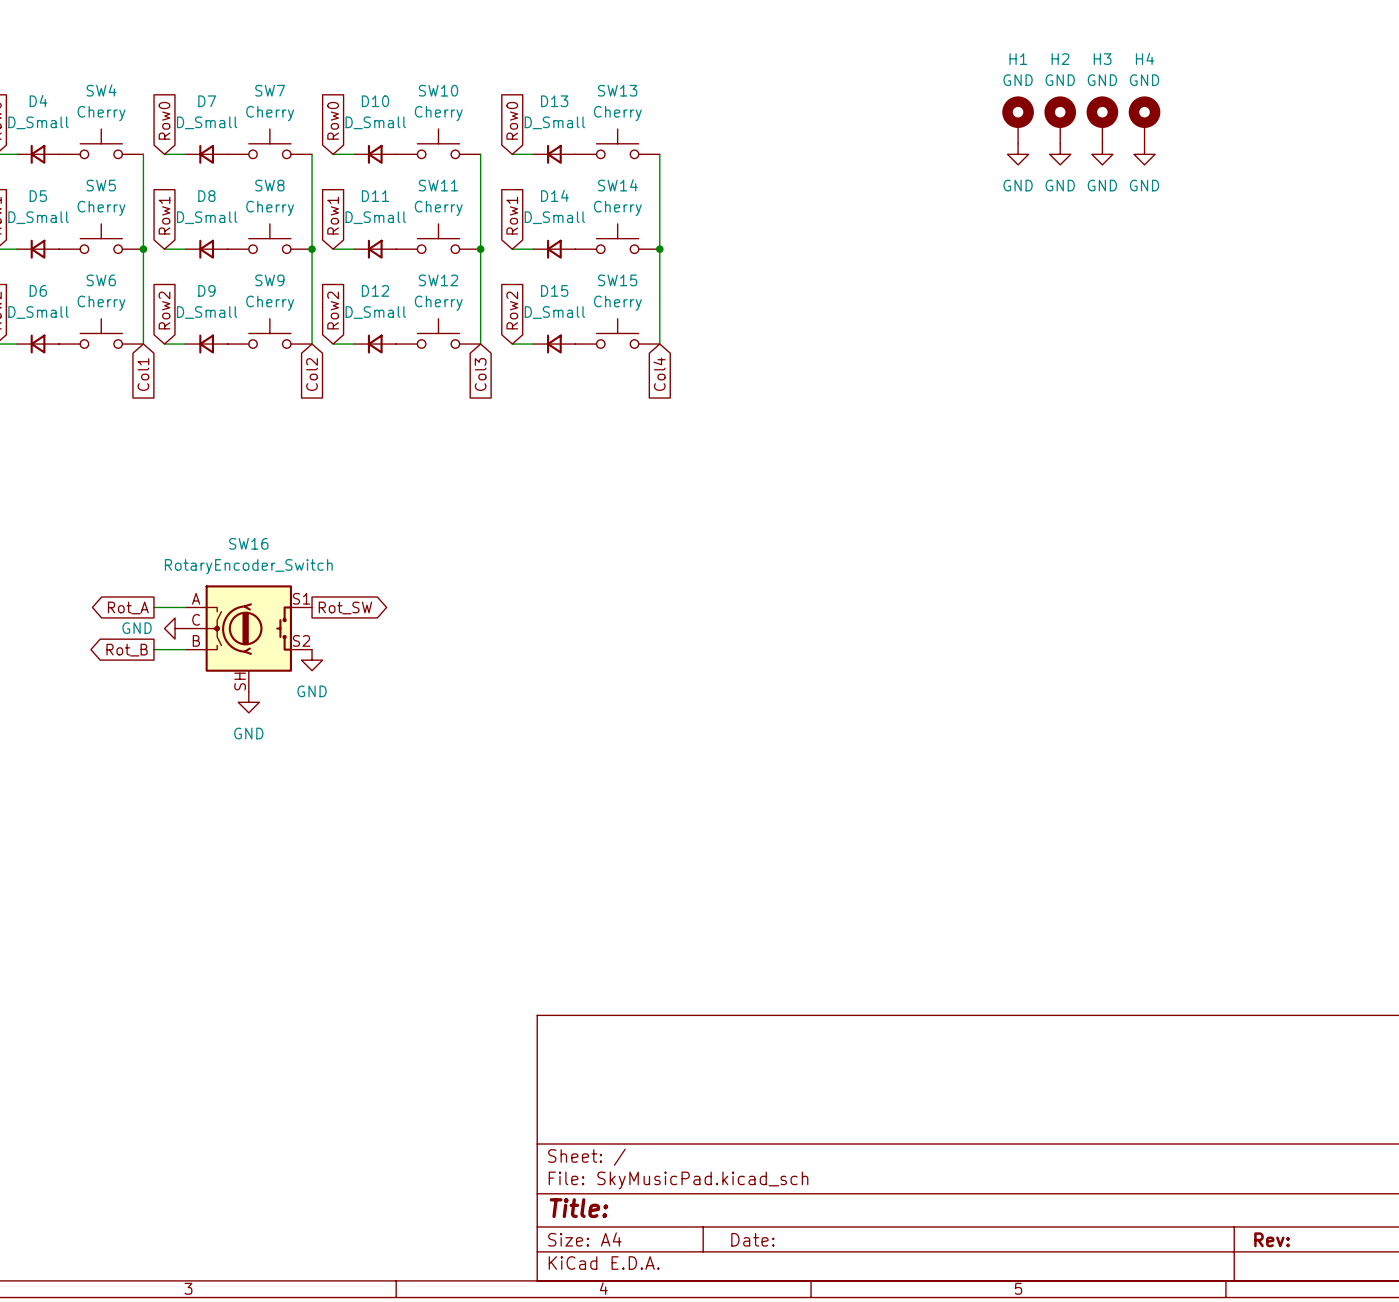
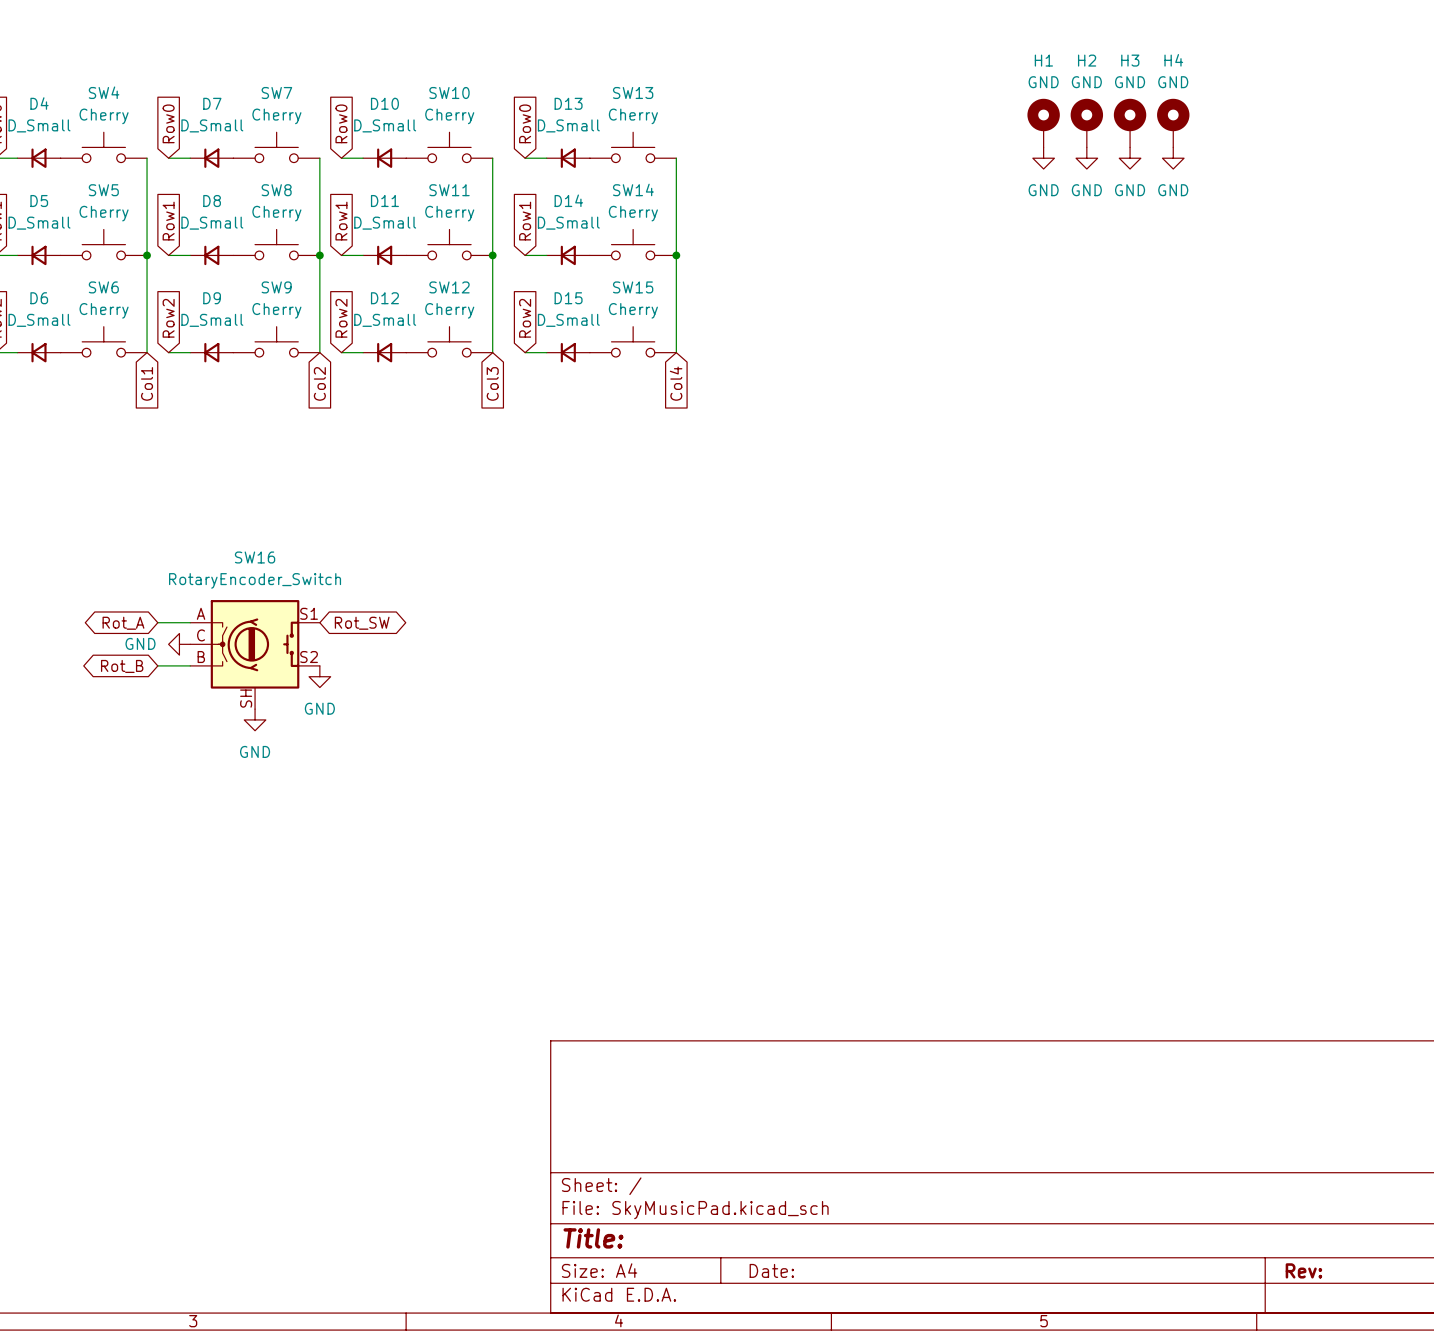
global label shape: output (128, 607) -> bidirectional (123, 623)
global label shape: output (345, 607) -> bidirectional (362, 623)
global label shape: output (127, 650) -> bidirectional (122, 666)

